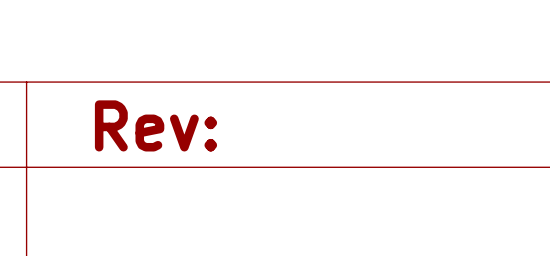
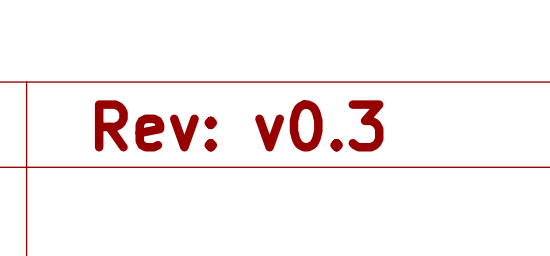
title block: Rev: (155, 125) -> Rev: v0.3 (239, 125)

